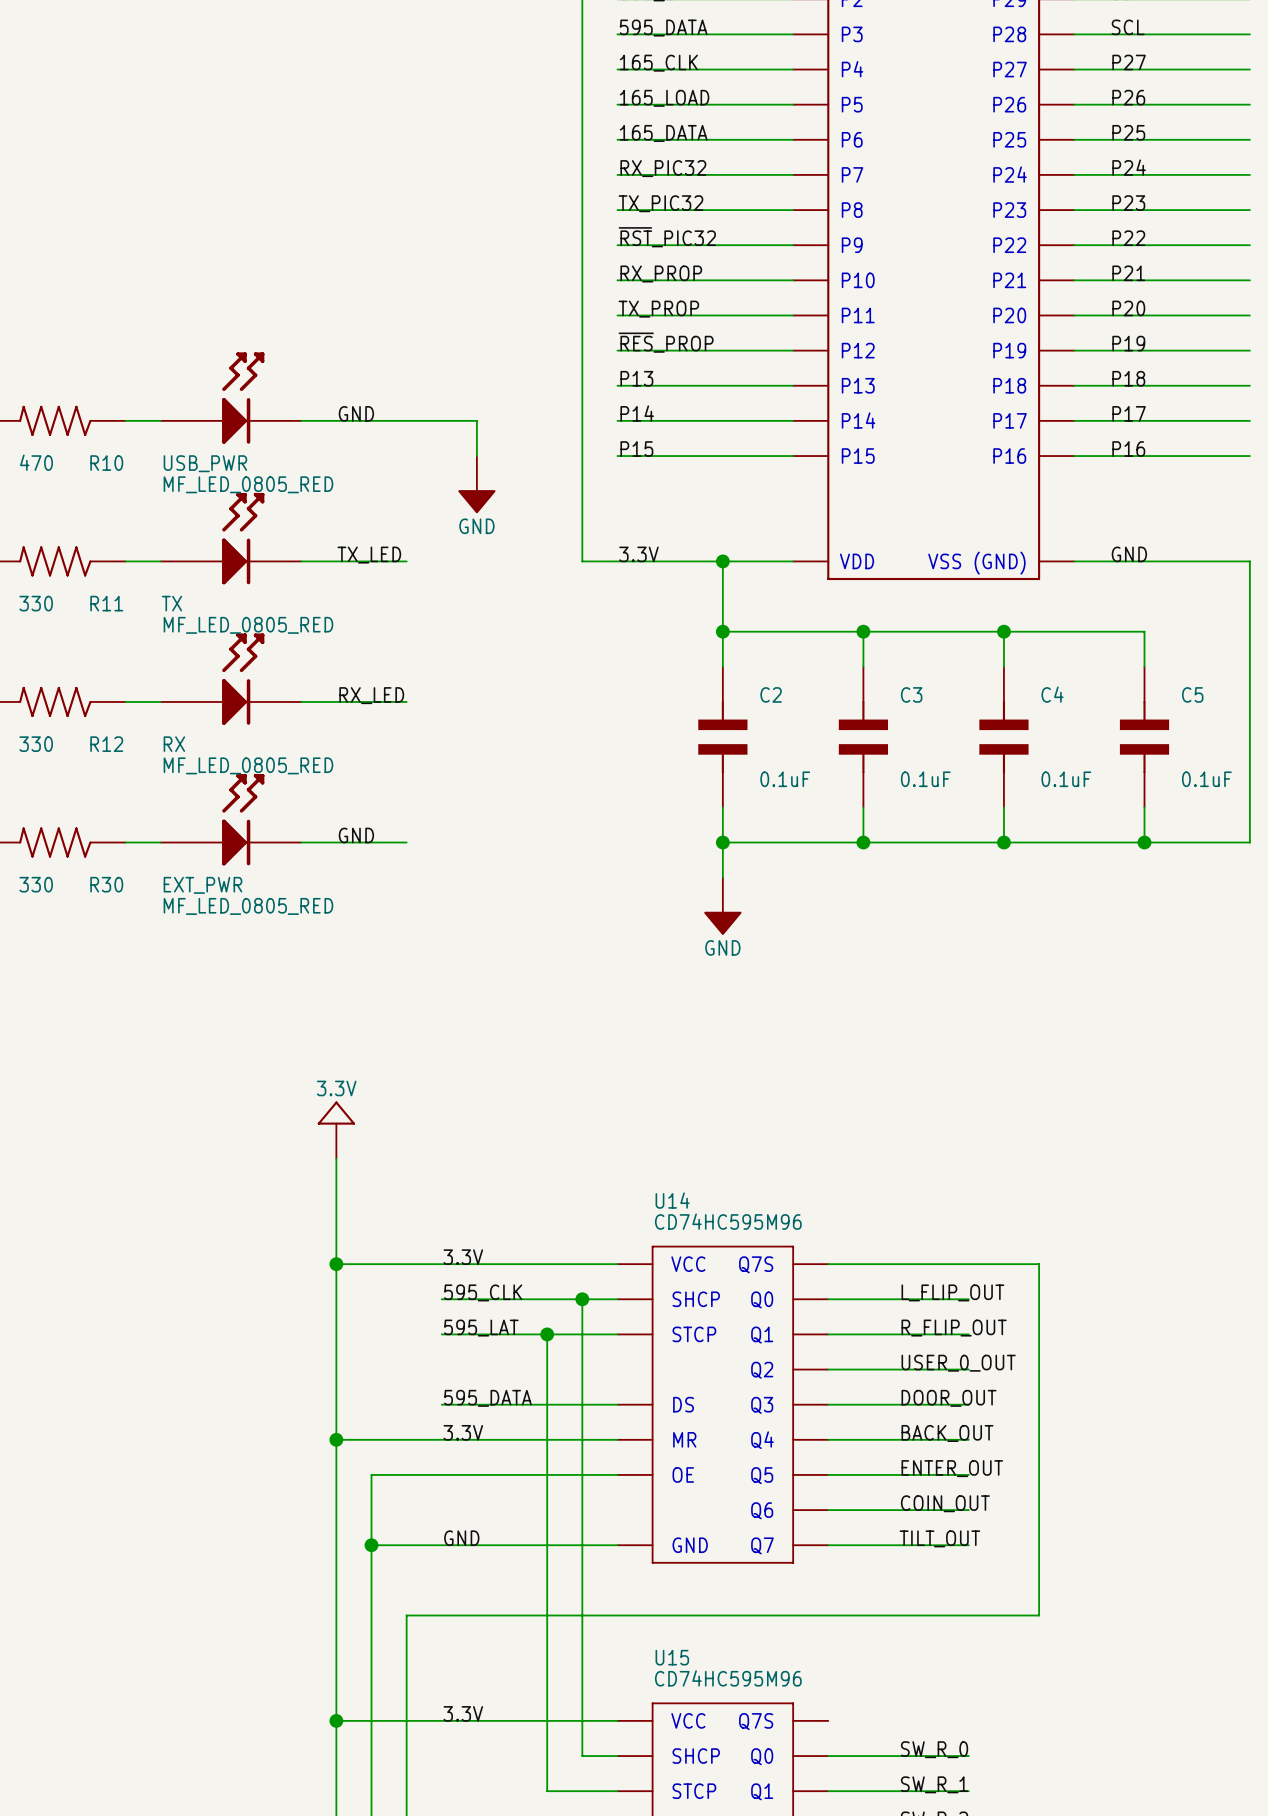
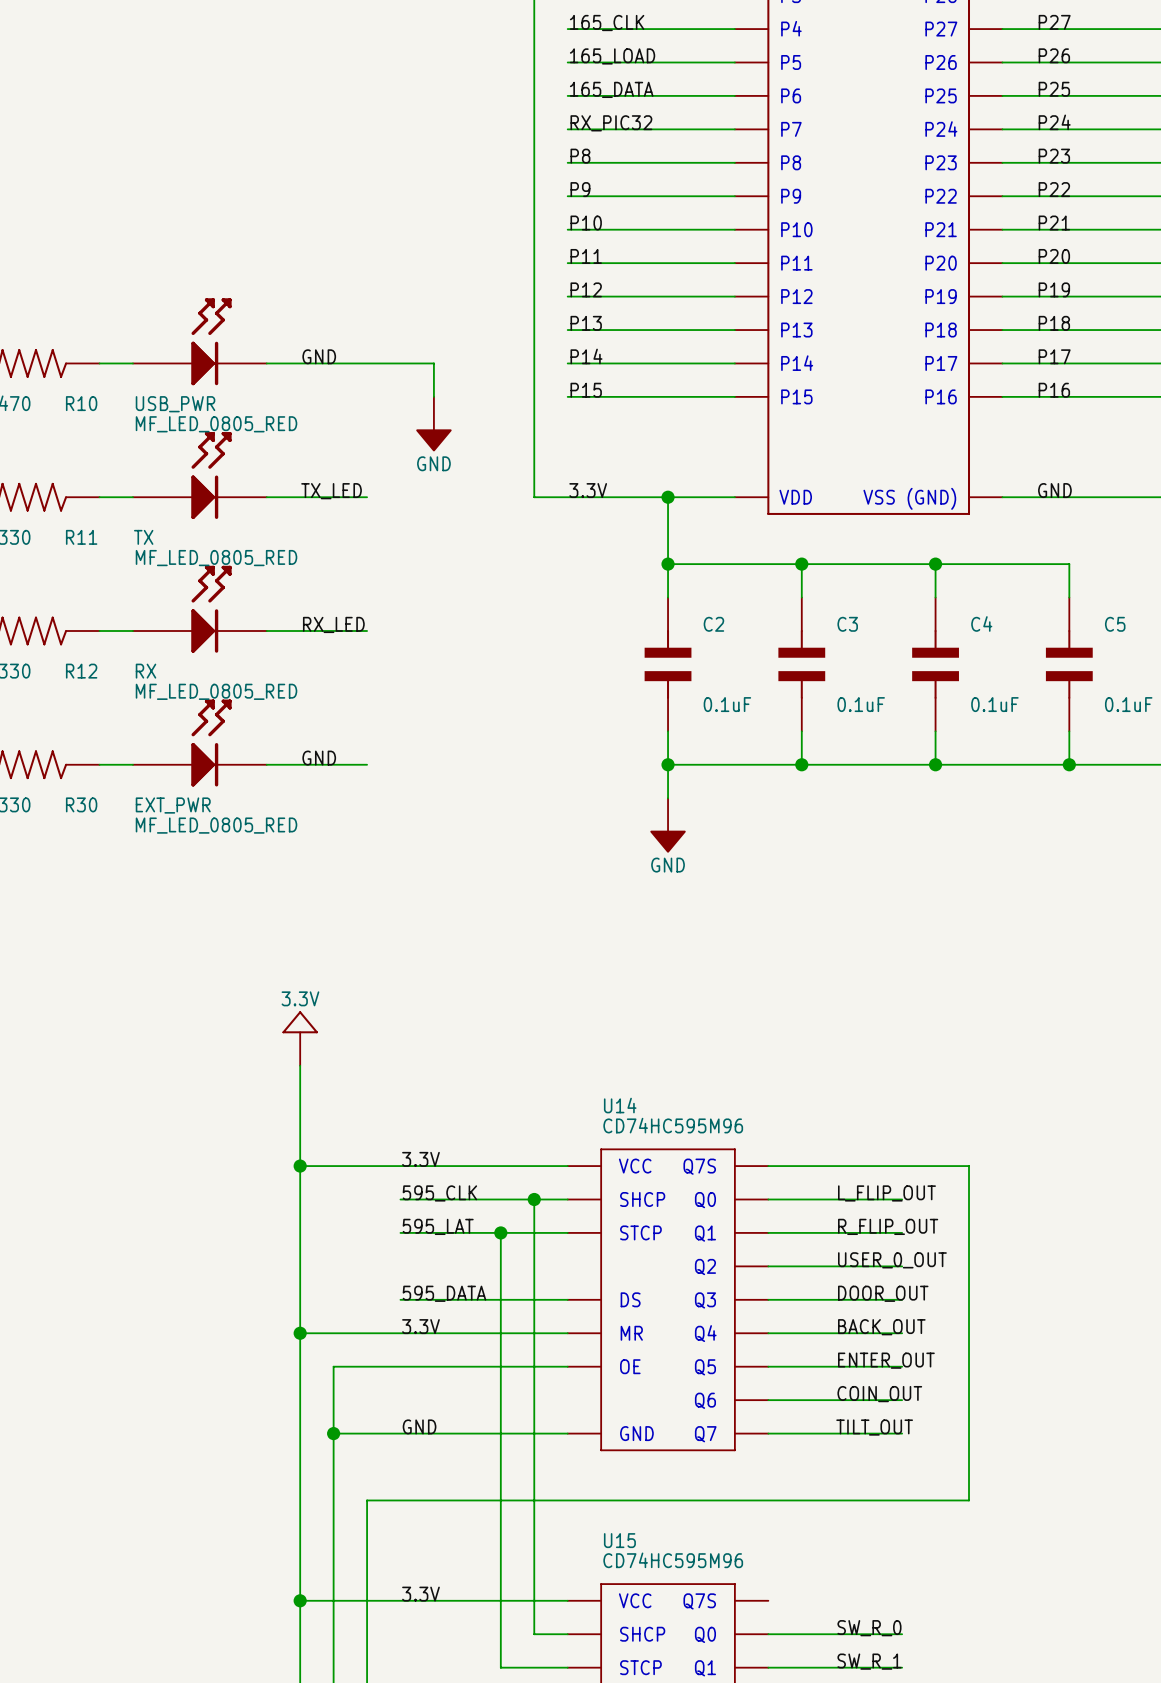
label: TX_PIC32 (660, 203) -> P8 (580, 156)
label: ~{RST}_PIC32 (667, 237) -> P9 (580, 189)
label: RX_PROP (661, 273) -> P10 (586, 223)
label: TX_PROP (658, 309) -> P11 (586, 256)
label: ~{RES}_PROP (666, 342) -> P12 (586, 289)

